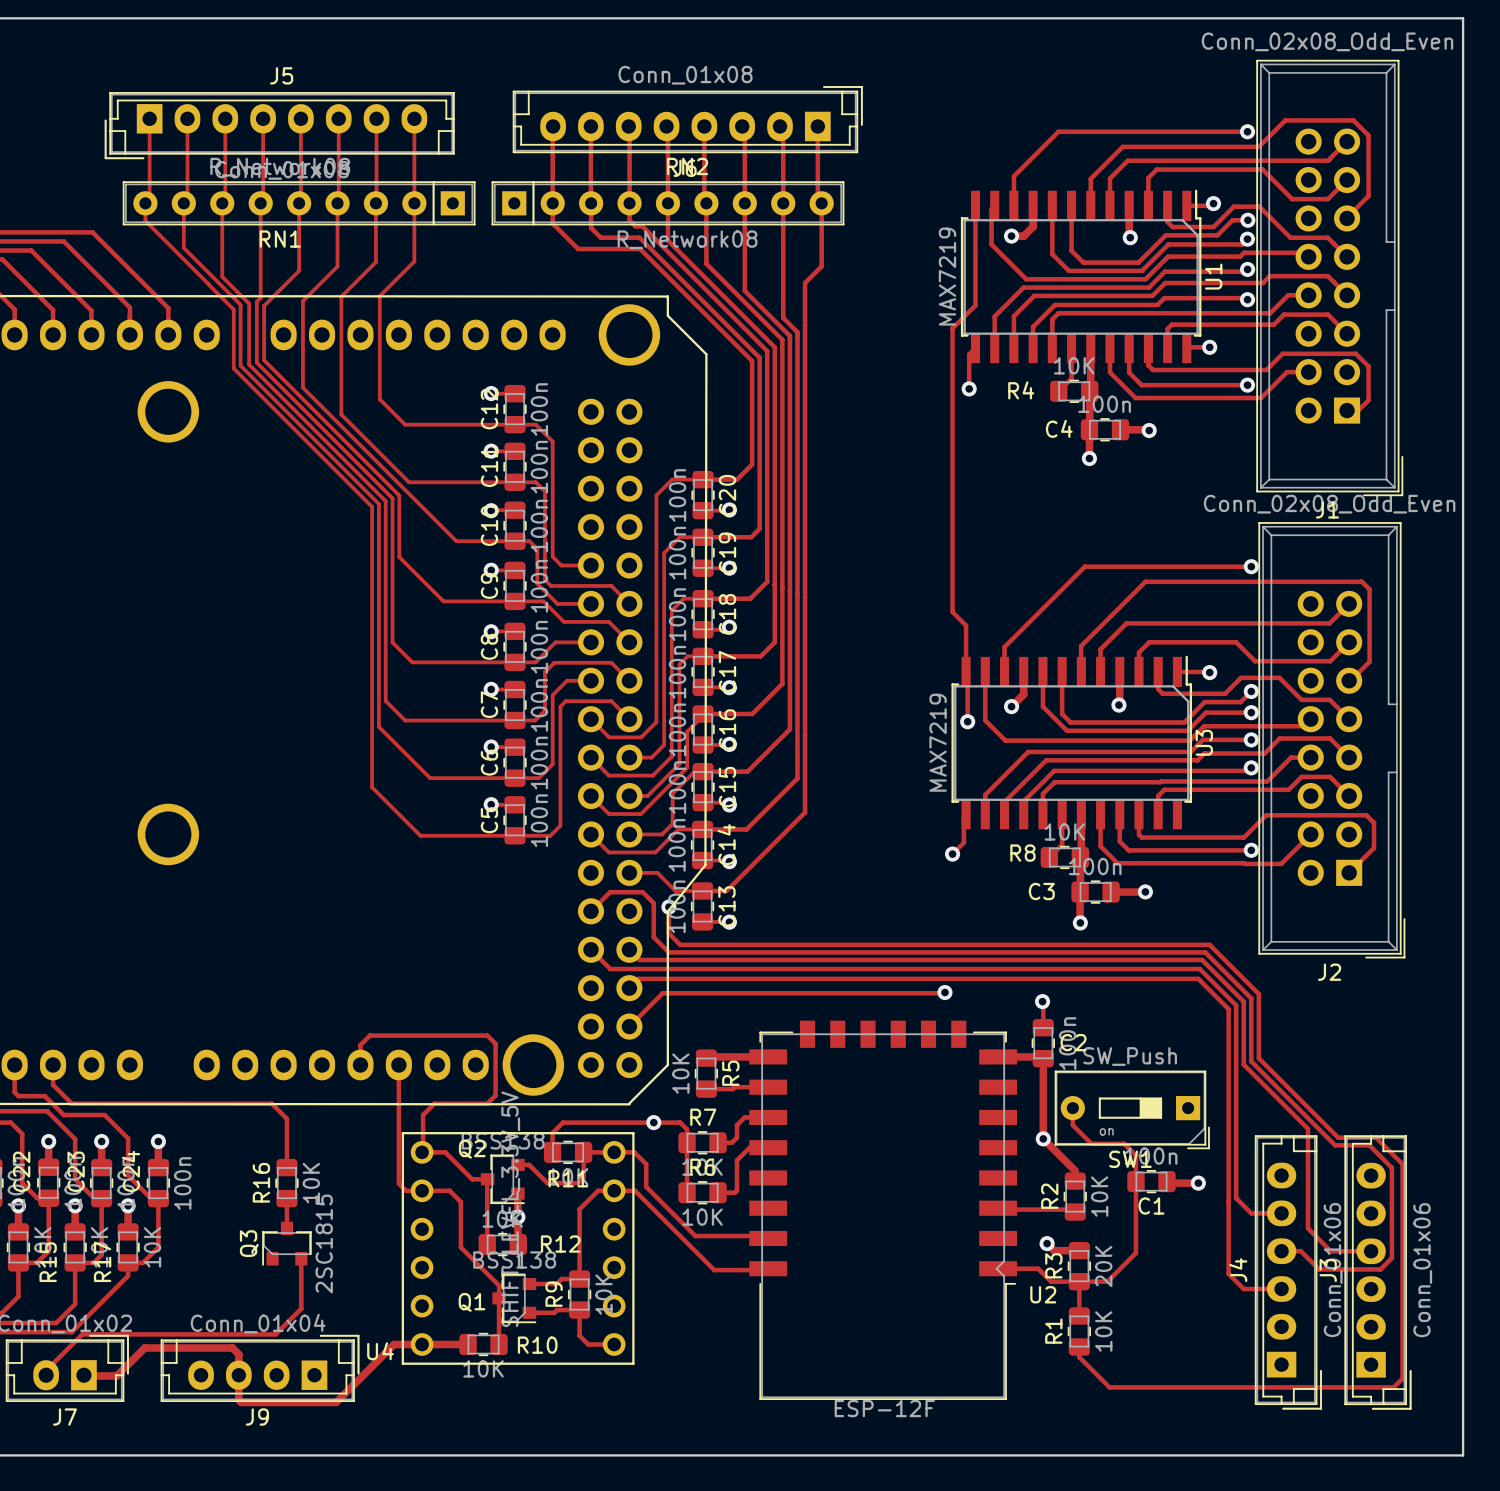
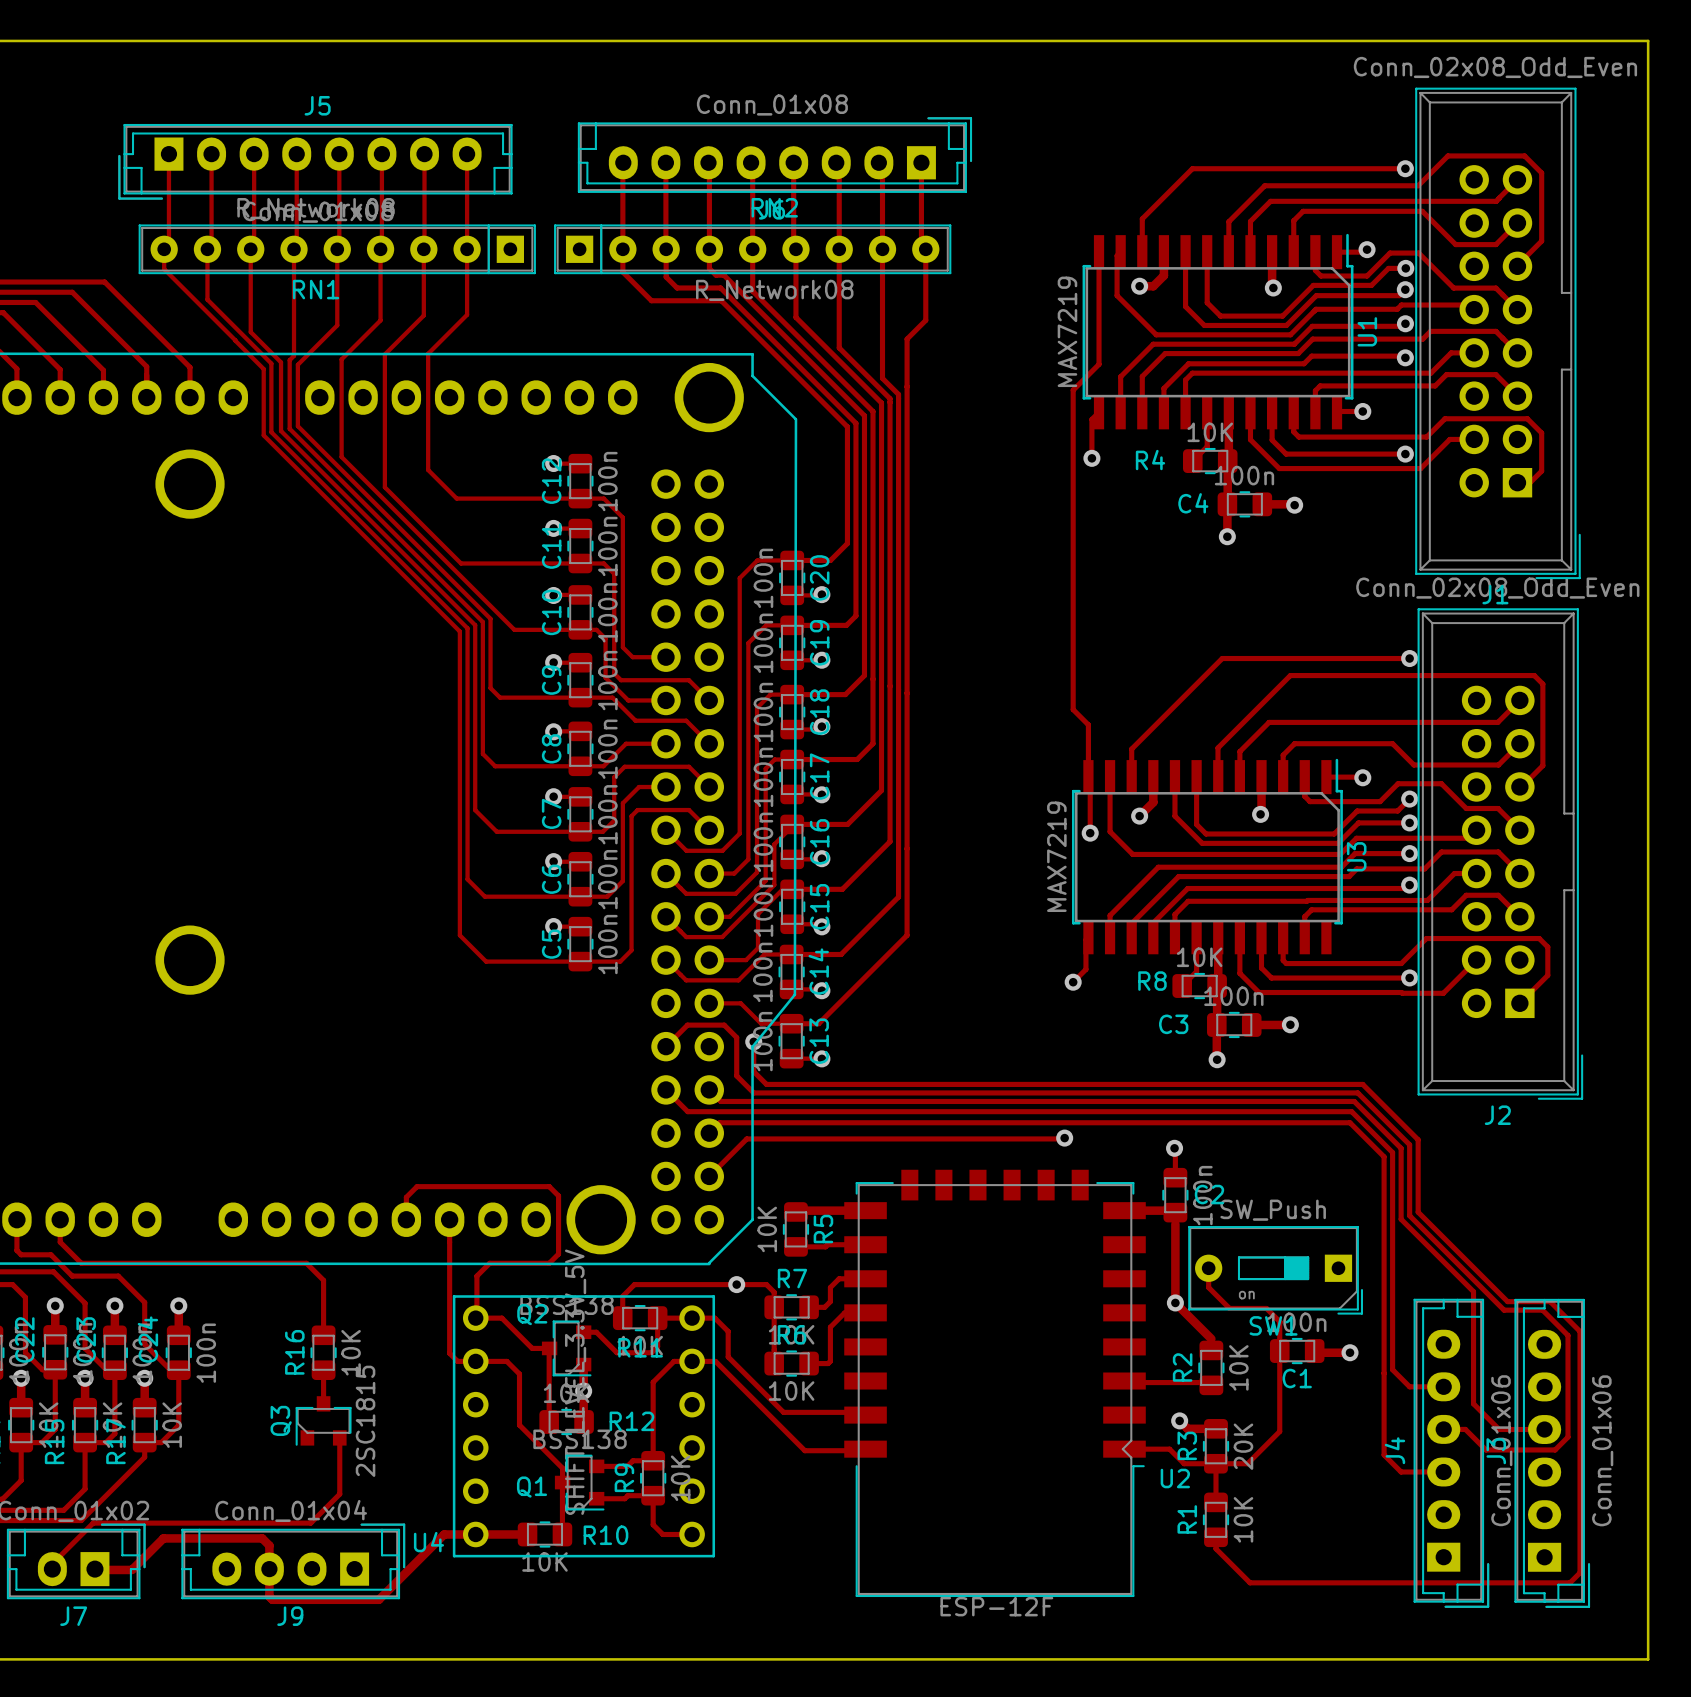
track: (399, 495) (399, 557) (435, 593) -> (450, 578) (490, 618) (490, 688)
track: (392, 498) (392, 642) (412, 662) (439, 662) -> (442, 581) (482, 622) (482, 753) (495, 766)
track: (385, 501) (385, 701) (405, 720) (440, 720) -> (434, 584) (475, 625) (475, 810) (496, 831)
track: (378, 504) (378, 726) (414, 762) -> (427, 587) (467, 628) (467, 879)
track: (372, 506) (372, 787) (420, 835) (431, 835) -> (419, 591) (459, 631) (459, 935) (486, 961)

